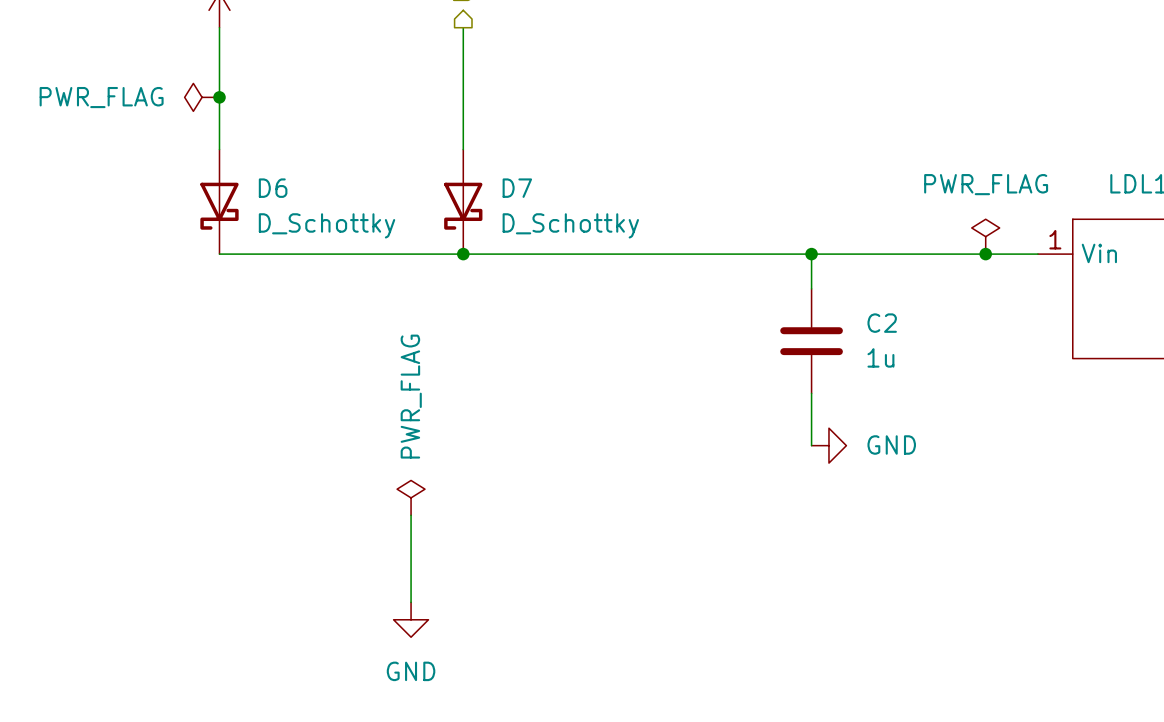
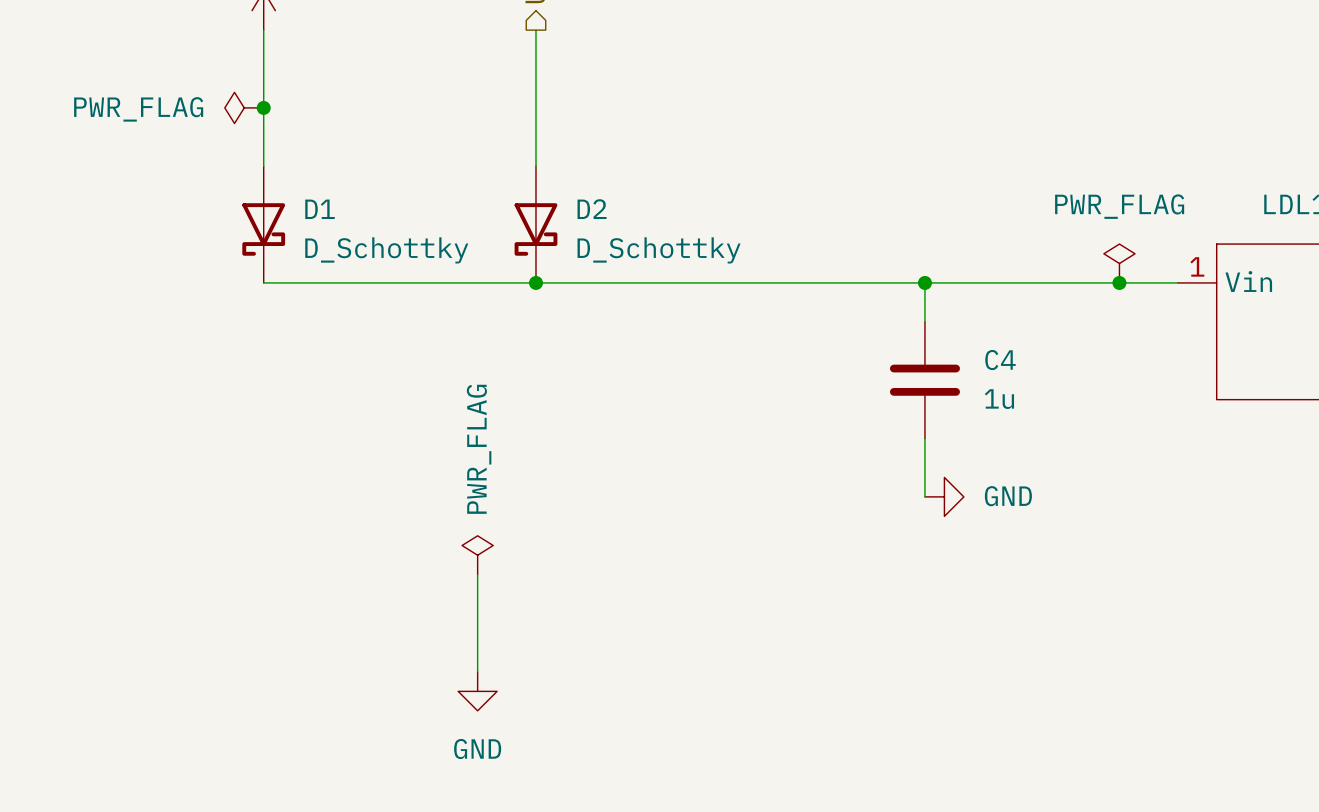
D6 name: D6 (273, 188) -> D1 (319, 209)
D7 name: D7 (517, 188) -> D2 (592, 209)
C2 name: C2 (882, 323) -> C4 (1000, 360)

